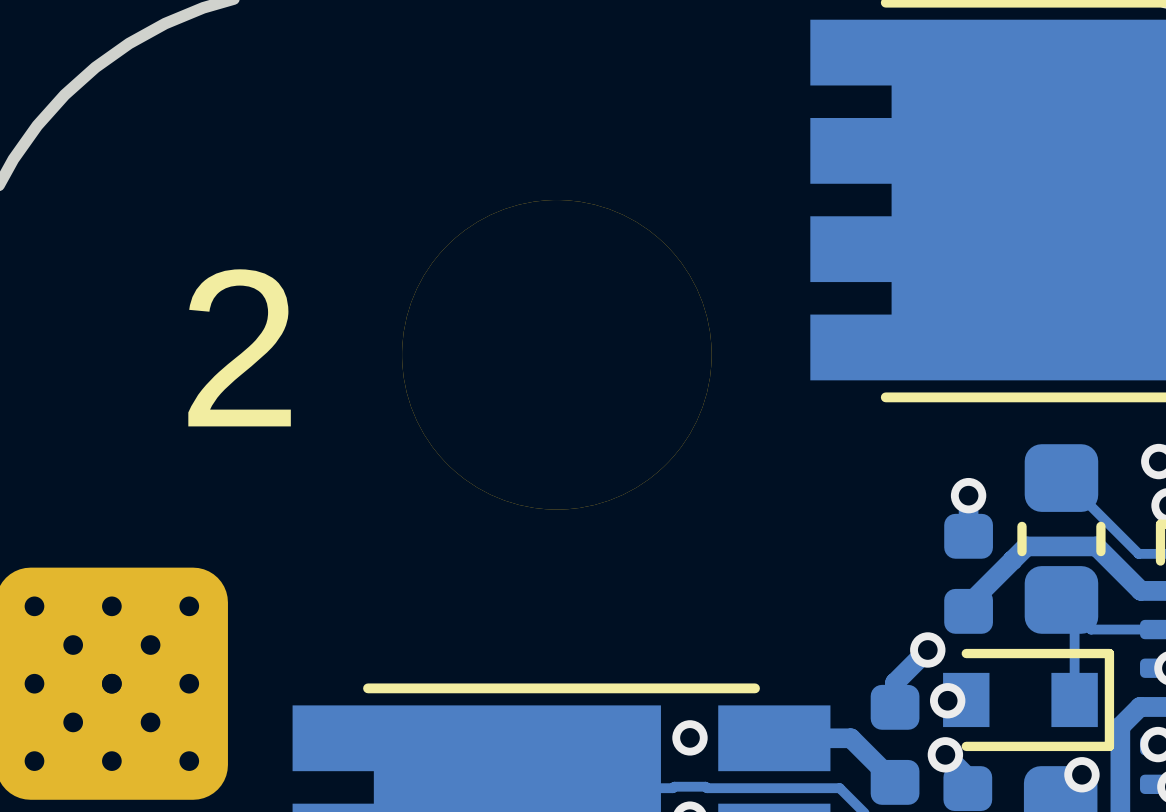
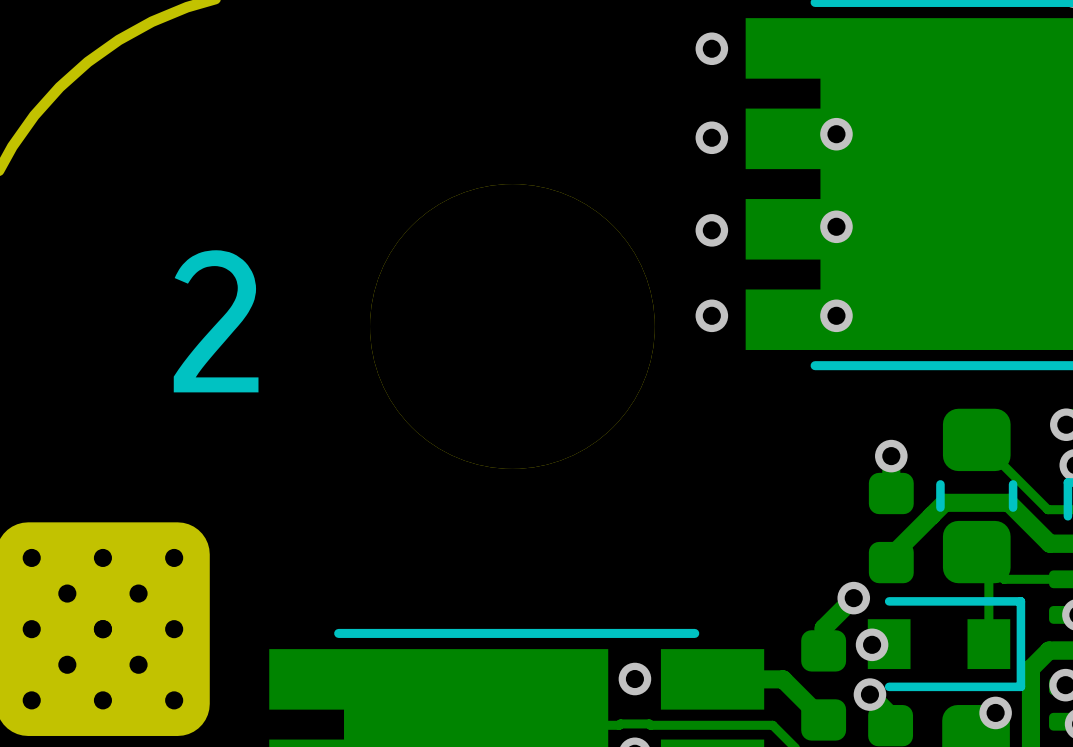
via: none -> (711, 48)
via: none -> (836, 134)
via: none -> (711, 137)
via: none -> (836, 226)
via: none -> (711, 230)
via: none -> (711, 315)
via: none -> (836, 315)

